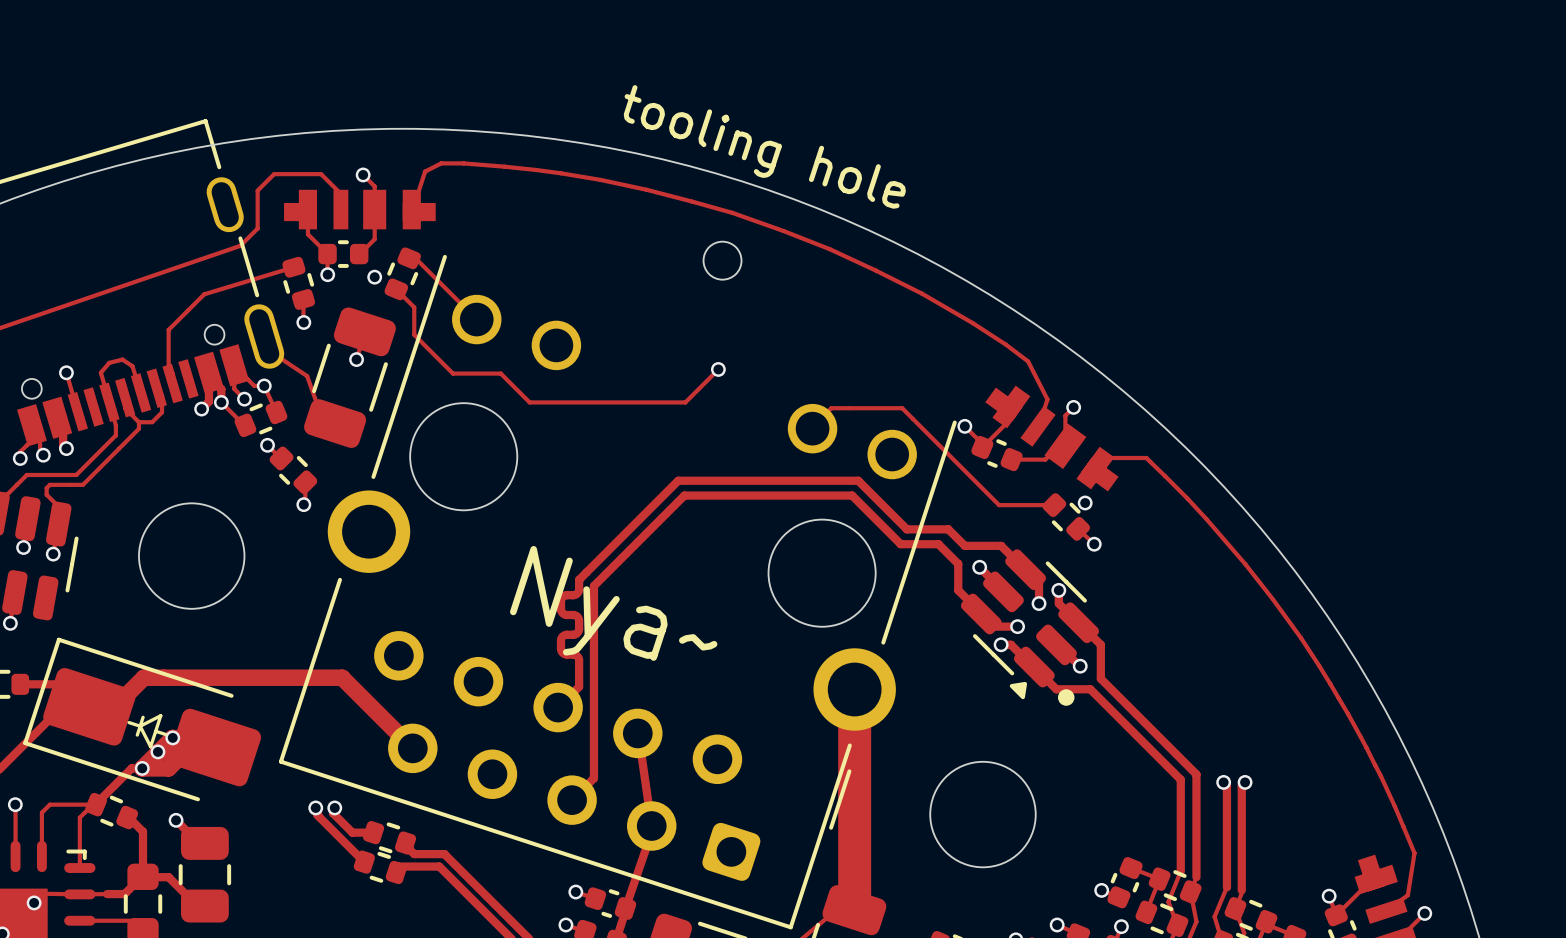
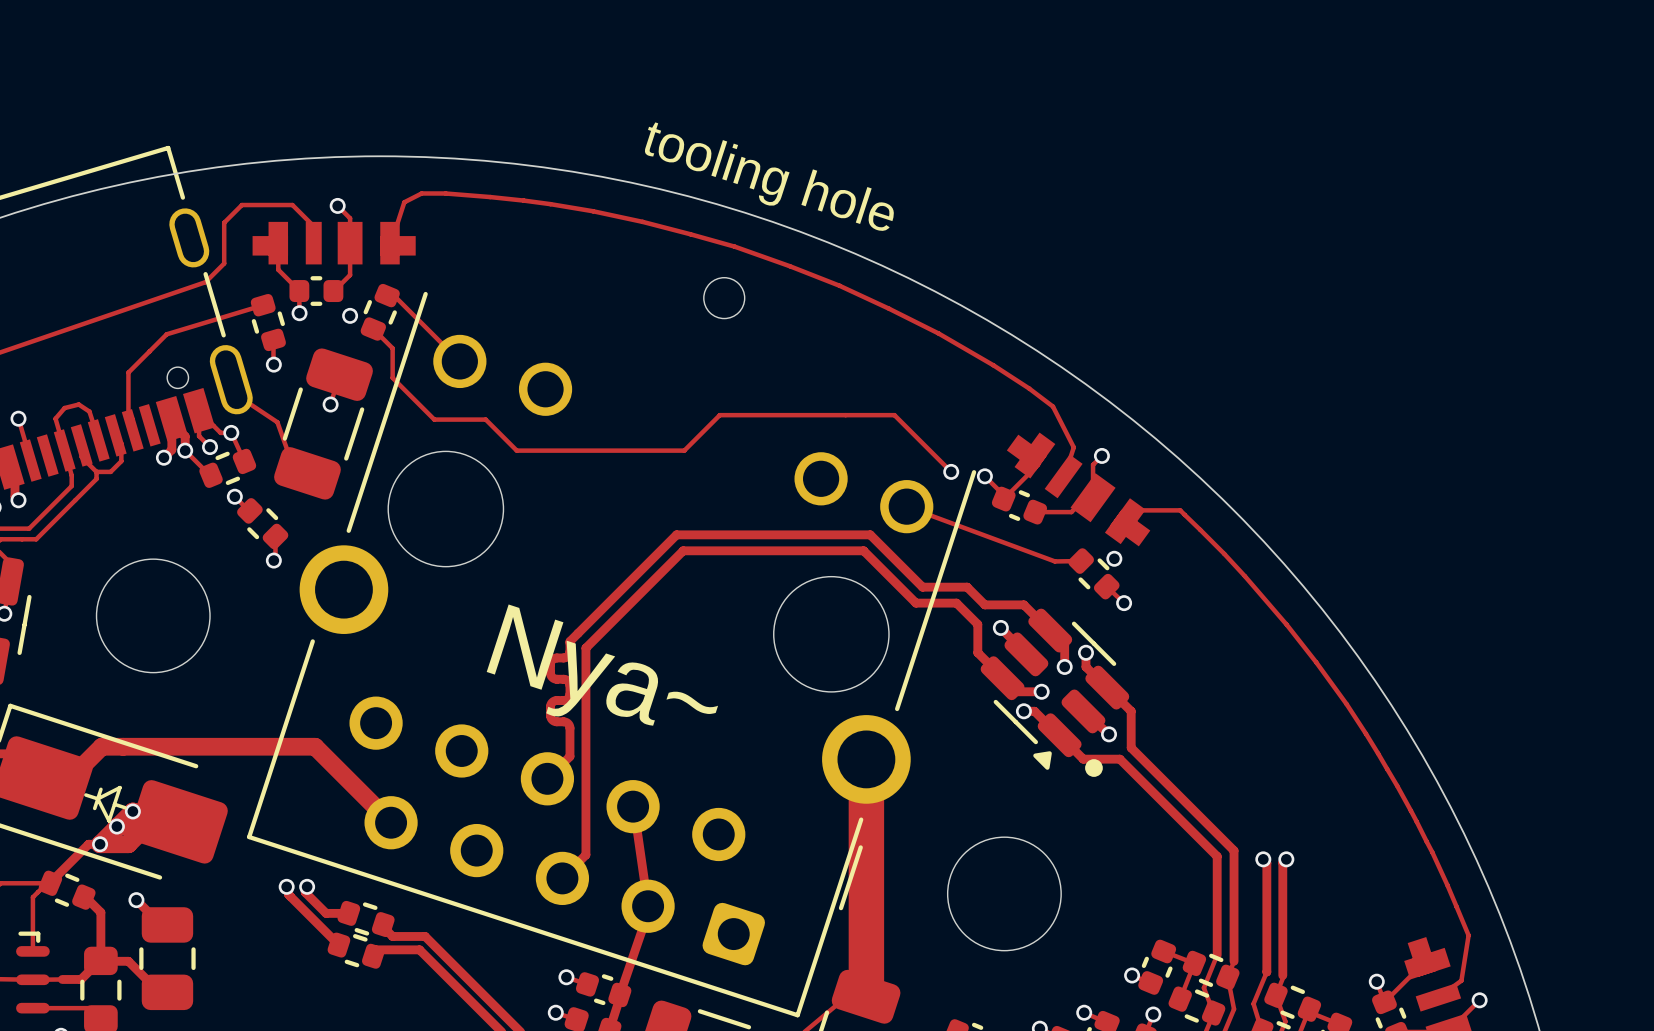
track: none -> (719, 415) (894, 415) (951, 471)
via: (718, 369) -> none
via: none -> (951, 471)
track: (811, 427) (831, 408) (902, 408) (999, 505) (1054, 505) -> (906, 506) (1054, 561) (1081, 561)

